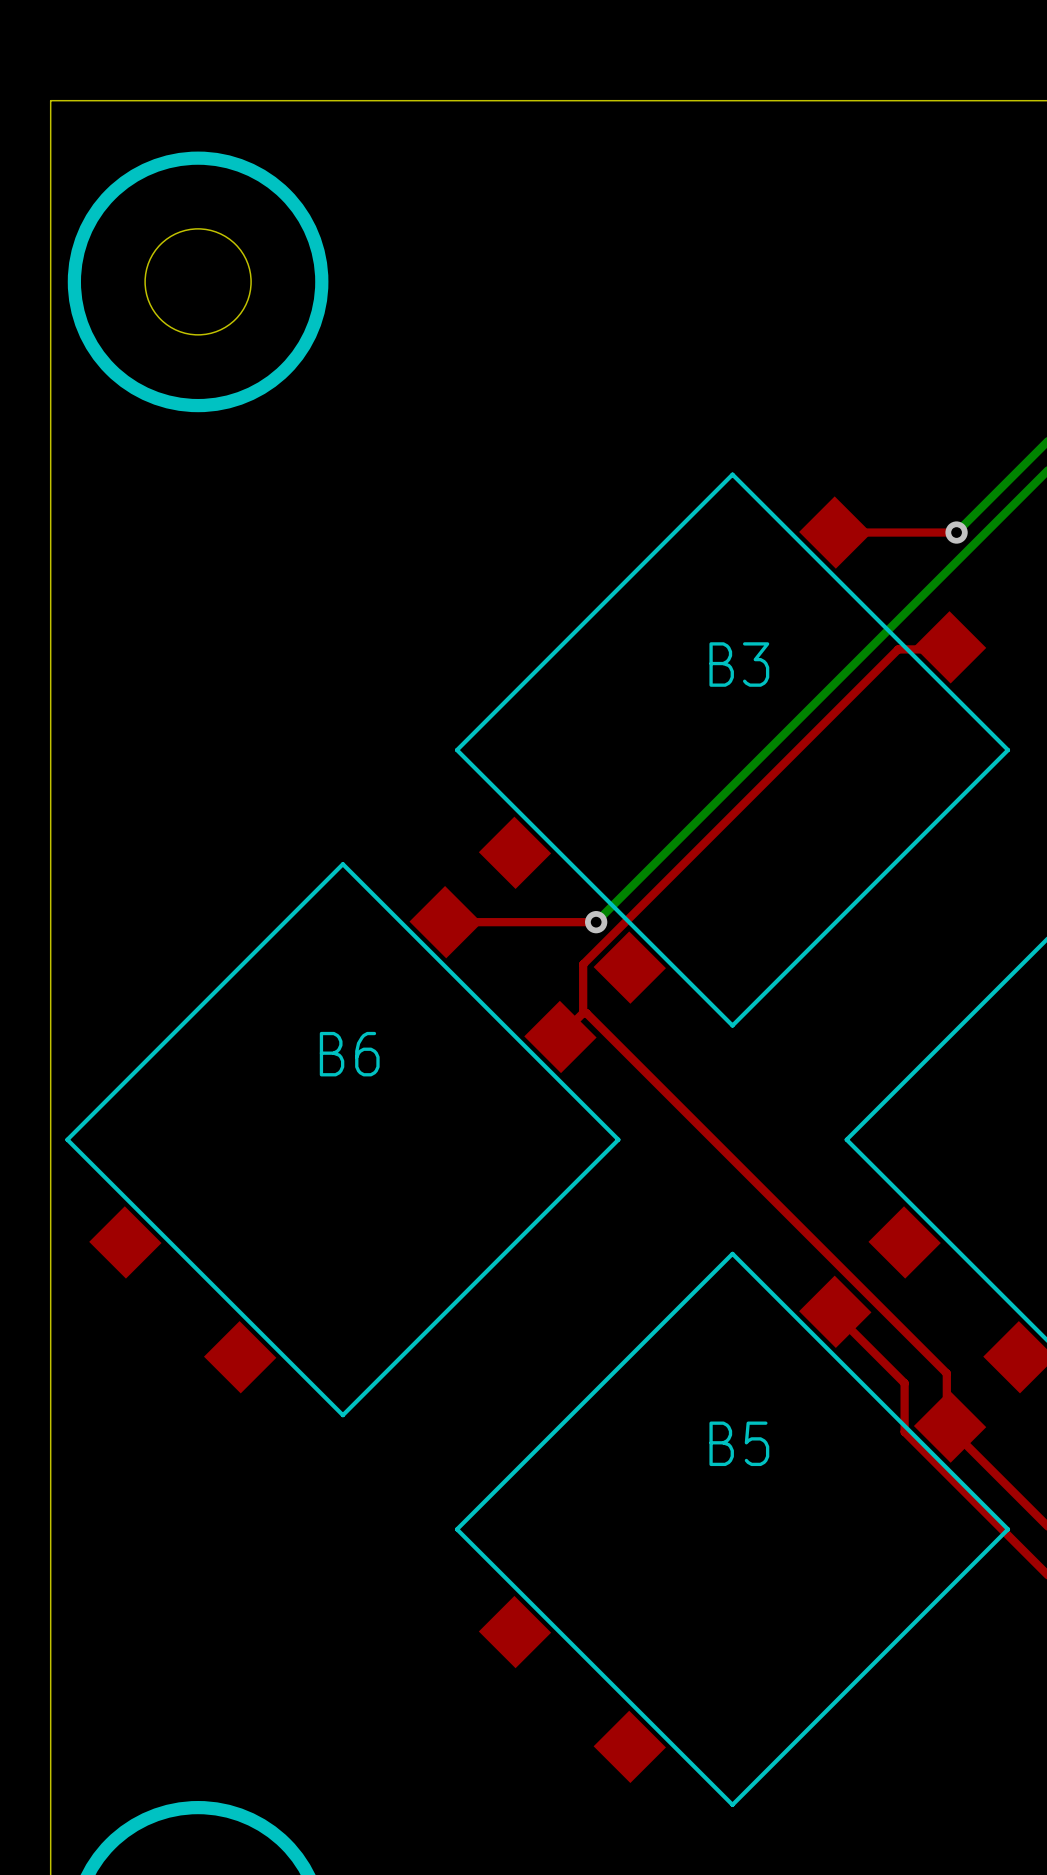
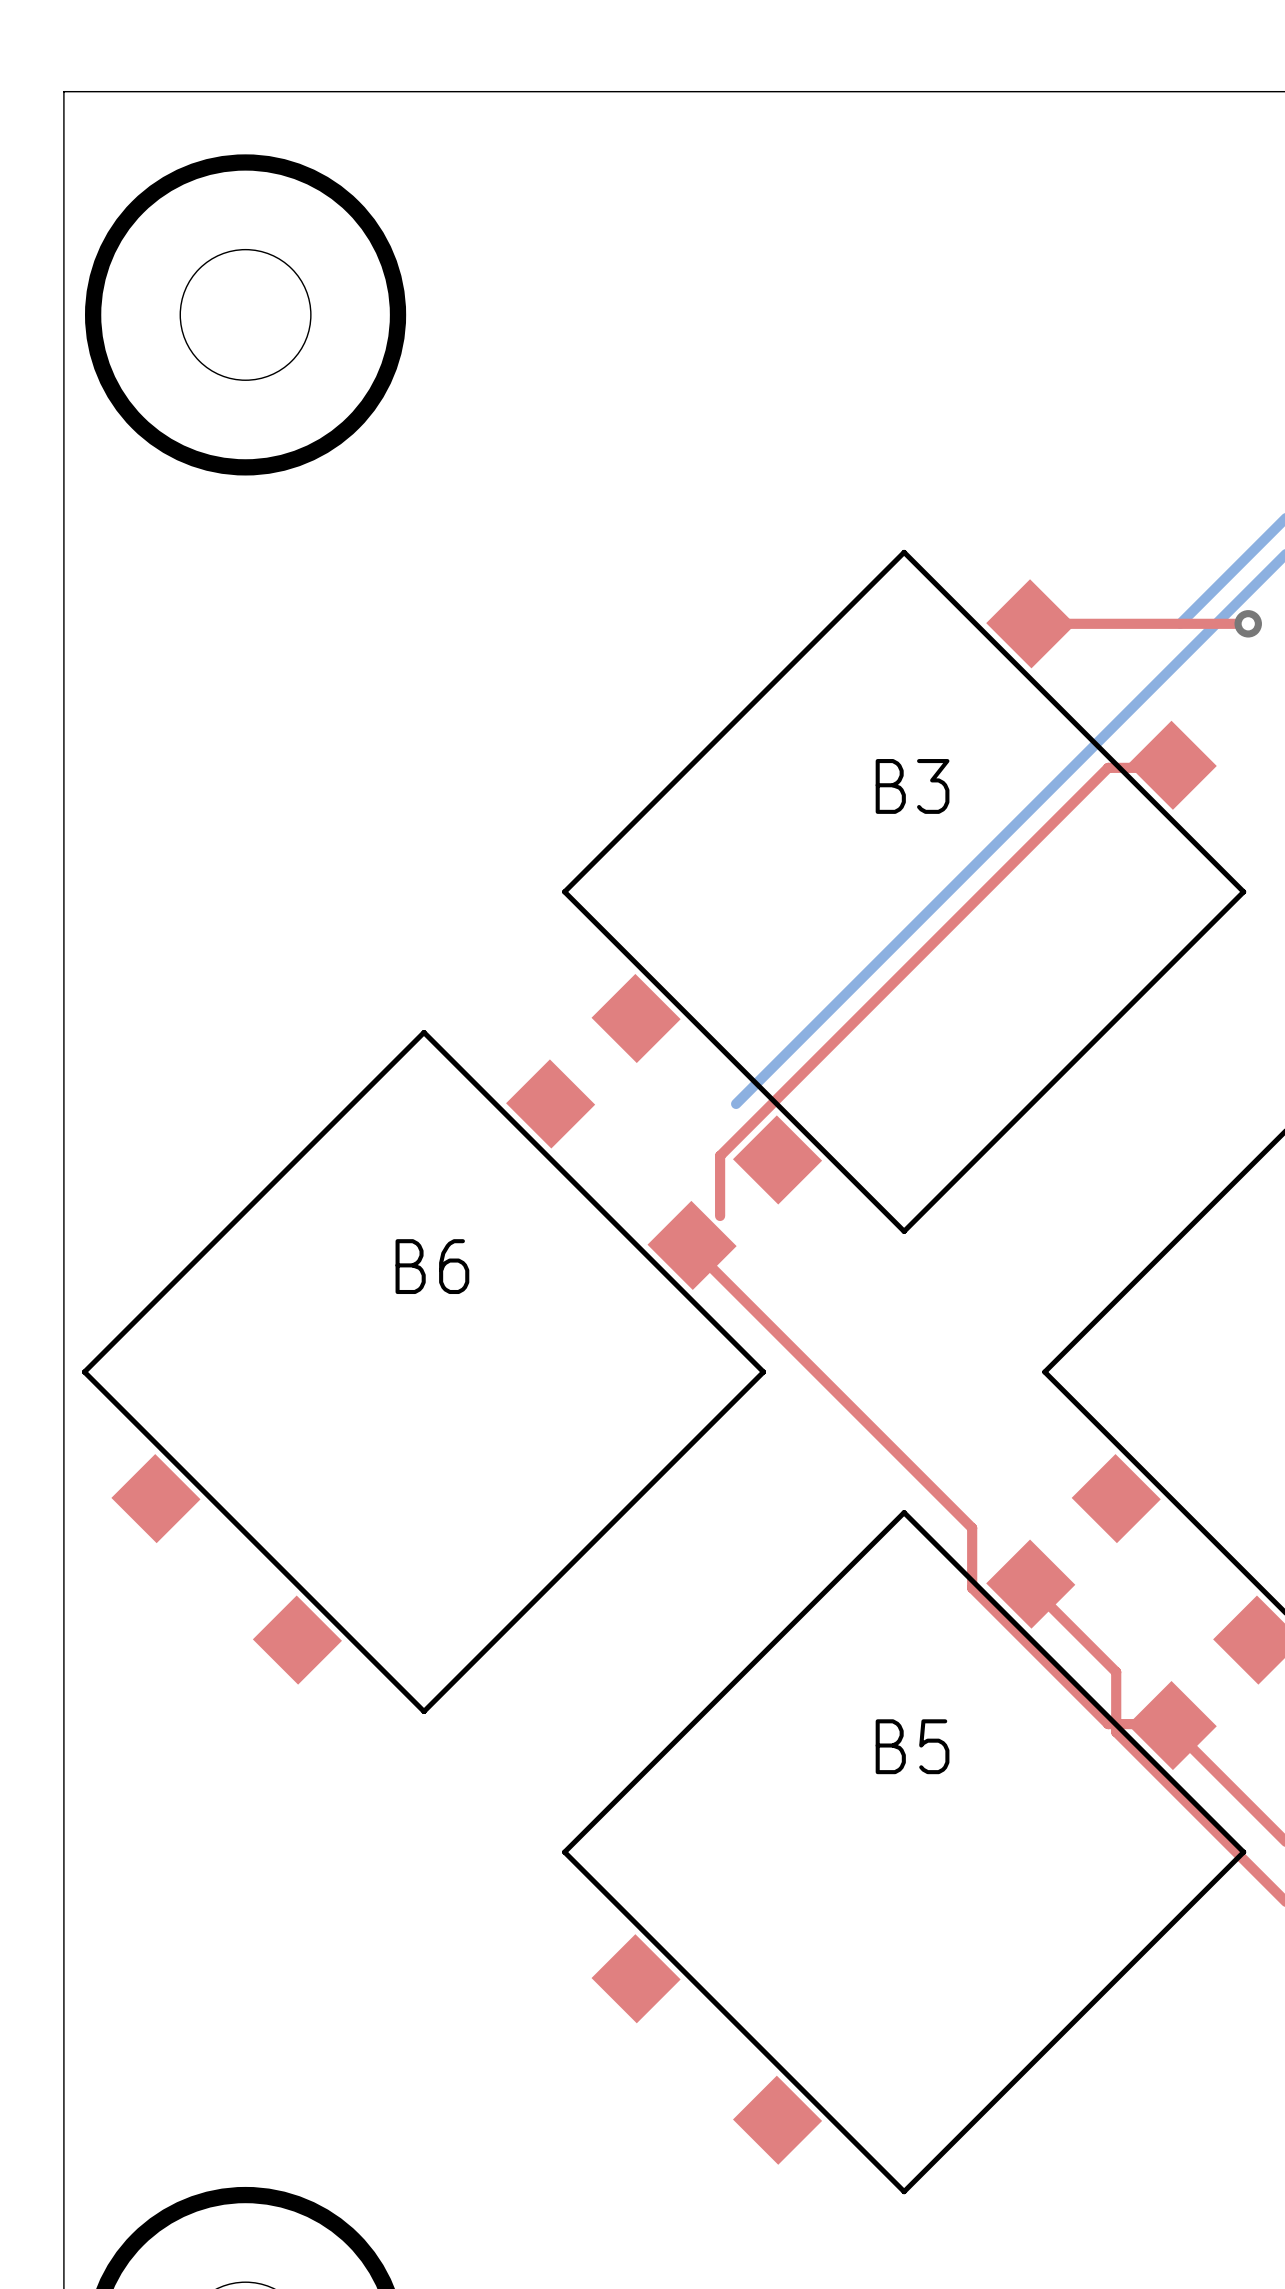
top track: none -> (1180, 623) (1248, 623)
via position: (956, 532) -> (1248, 623)
top track: (446, 922) (596, 922) -> none
via: (596, 922) -> none
top track: (560, 1036) (583, 1013) (586, 1013) (946, 1373) (946, 1425) -> (692, 1245) (692, 1247) (972, 1528) (972, 1588) (1108, 1724) (1168, 1724)

